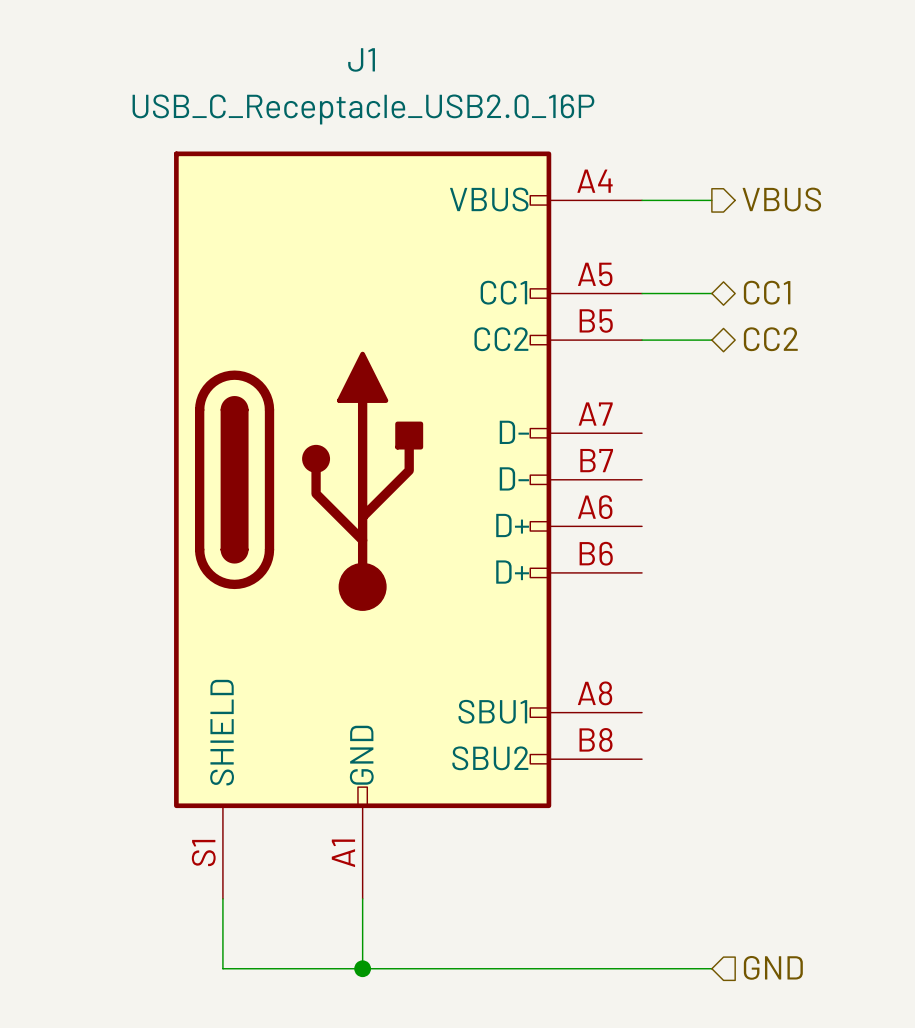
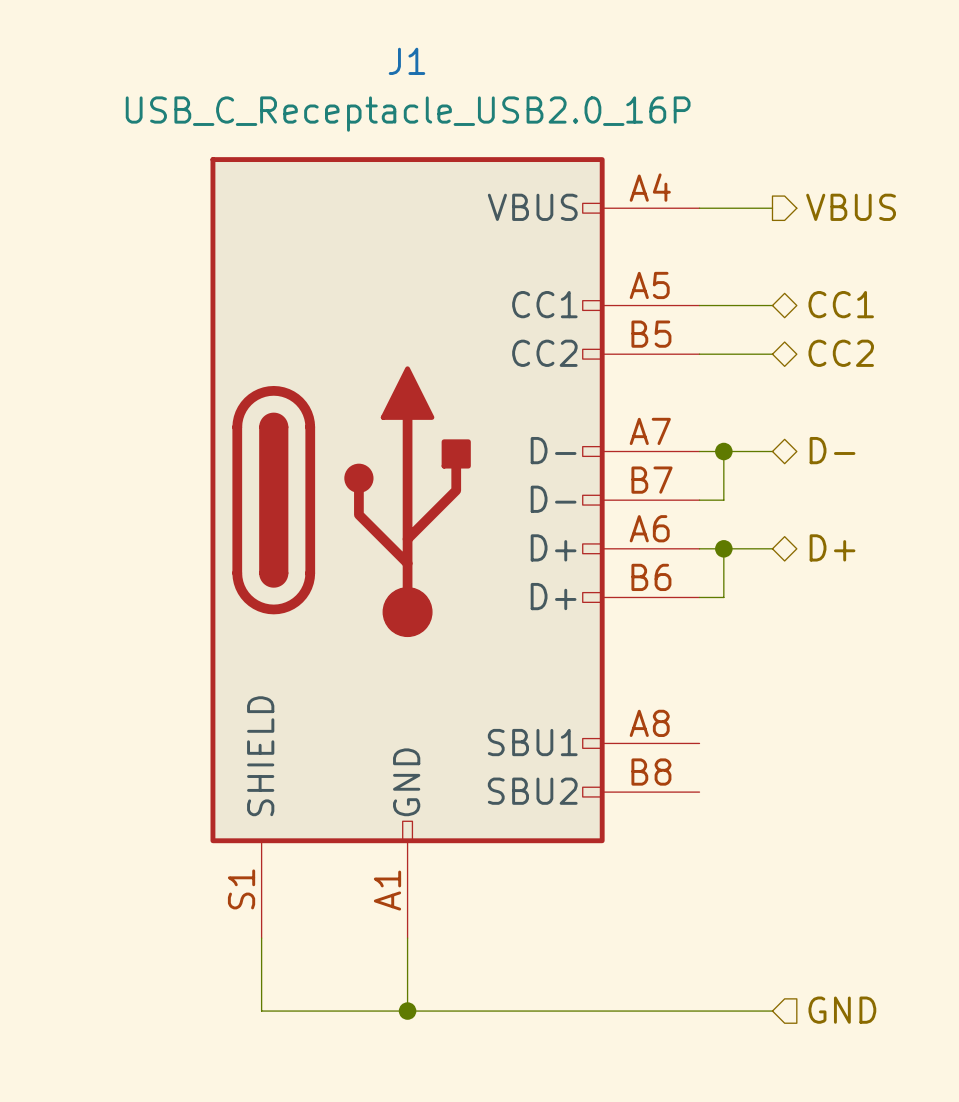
hierarchical label: none -> D- (832, 450)
wire: none -> (699, 451) (772, 451)
wire: none -> (723, 451) (723, 500) (699, 500)
junction: none -> (723, 451)
hierarchical label: none -> D+ (832, 547)
wire: none -> (699, 548) (772, 548)
wire: none -> (723, 548) (723, 597) (699, 597)
junction: none -> (723, 548)

